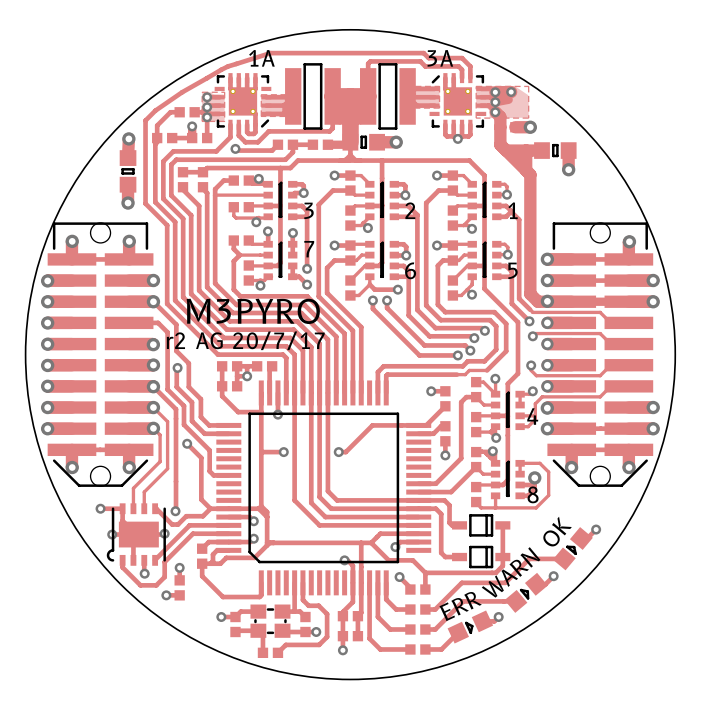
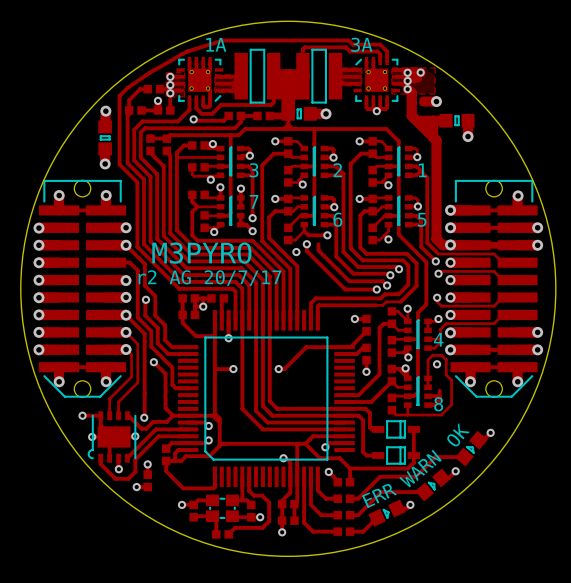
via position: (387, 300) -> (296, 252)
via: none -> (437, 364)
track: (520, 463) (539, 463) (548, 472) -> (428, 378) (428, 359) (432, 355) (441, 355) (446, 359) (446, 374) (451, 380) (451, 385)
via: (534, 477) -> none

